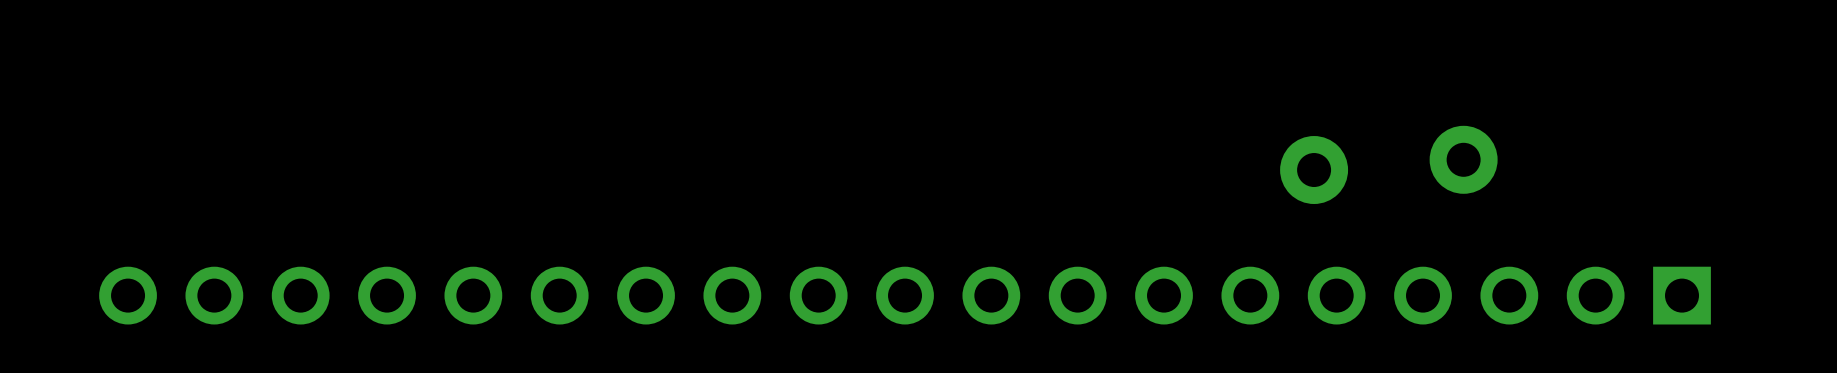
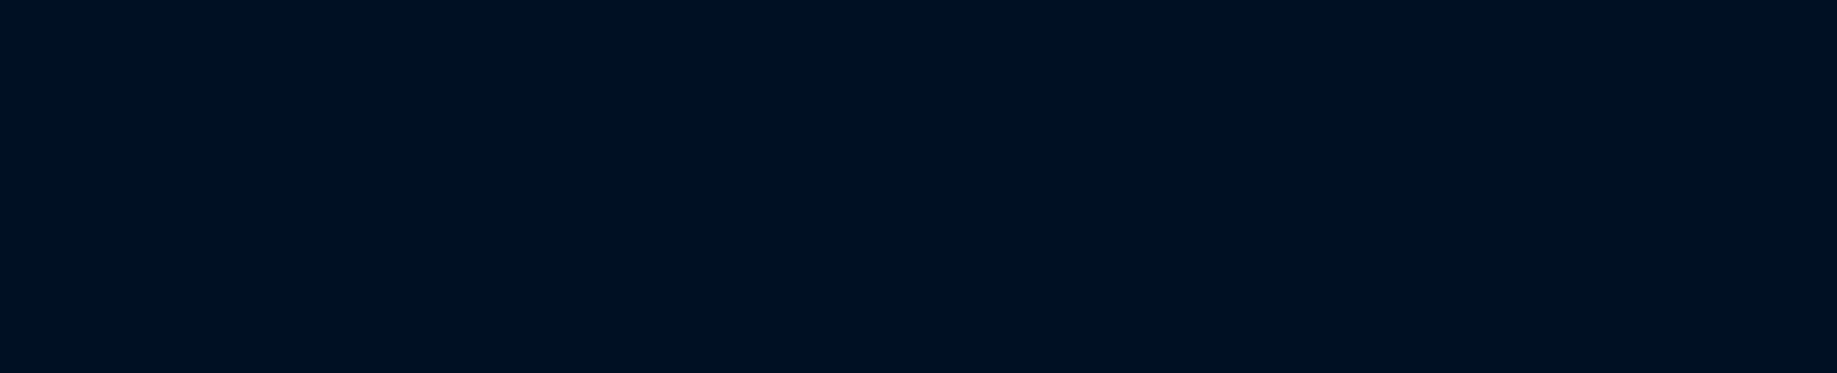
part: (1463, 159) -> none
part: (1314, 170) -> none
part: (905, 295) -> none

